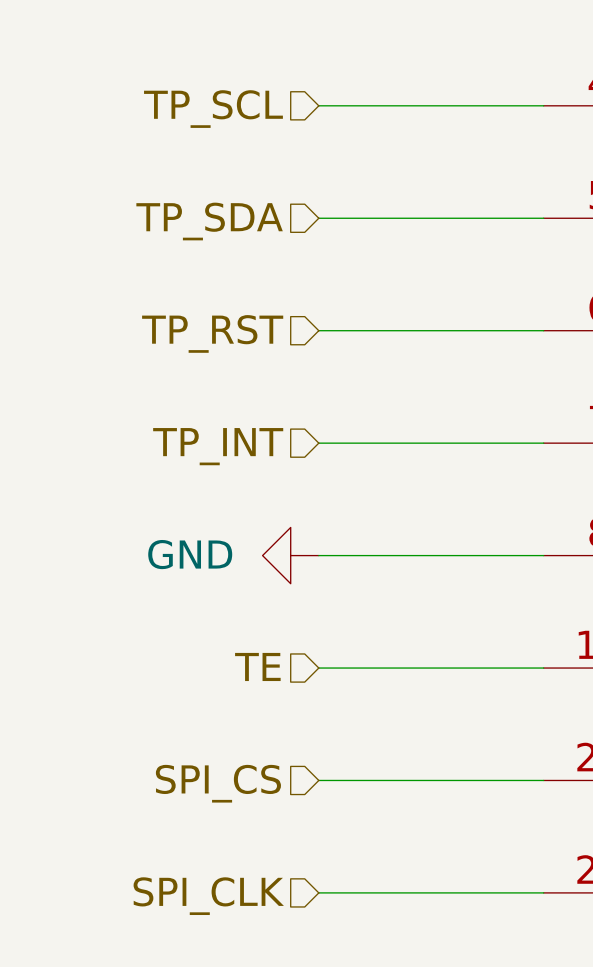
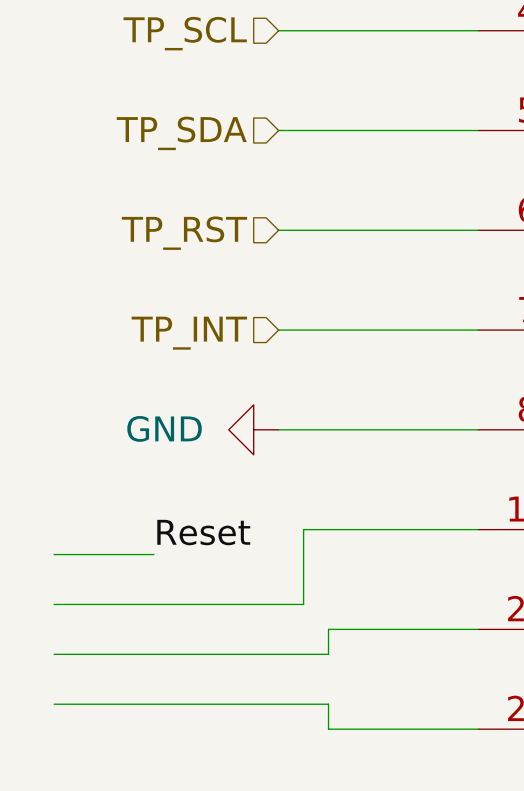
hierarchical label: TE (257, 666) -> none
wire: (318, 668) (346, 668) -> (54, 604) (303, 604) (303, 529)
label: none -> Reset (203, 532)
wire: none -> (54, 554) (153, 554)
wire: (318, 780) (375, 780) -> (54, 654) (328, 654) (328, 629)
hierarchical label: SPI_CS (218, 783) -> none
wire: (318, 892) (375, 892) -> (54, 704) (328, 704) (328, 729)
hierarchical label: SPI_CLK (208, 896) -> none

